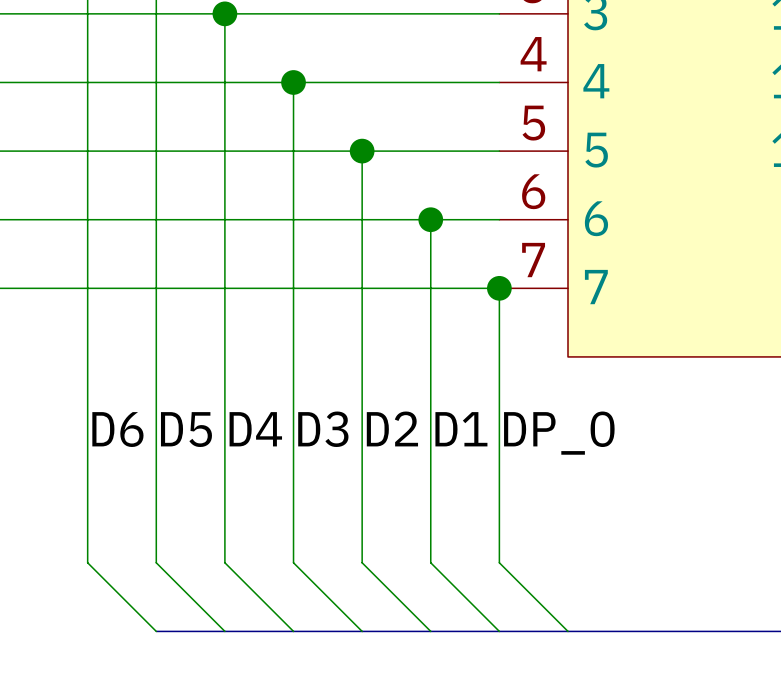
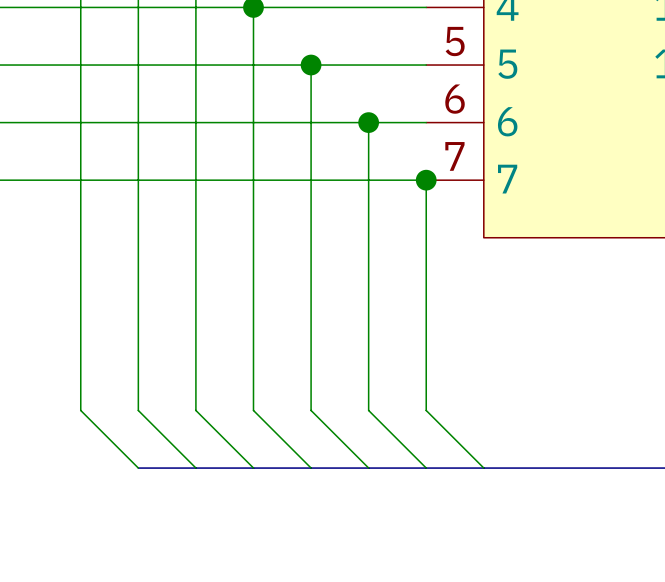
label: D2 (392, 428) -> none
label: D6 (117, 429) -> none
label: D5 (186, 429) -> none
label: D4 (255, 429) -> none
label: D3 (323, 429) -> none
label: D1 (461, 429) -> none
label: DP_O (559, 433) -> none

